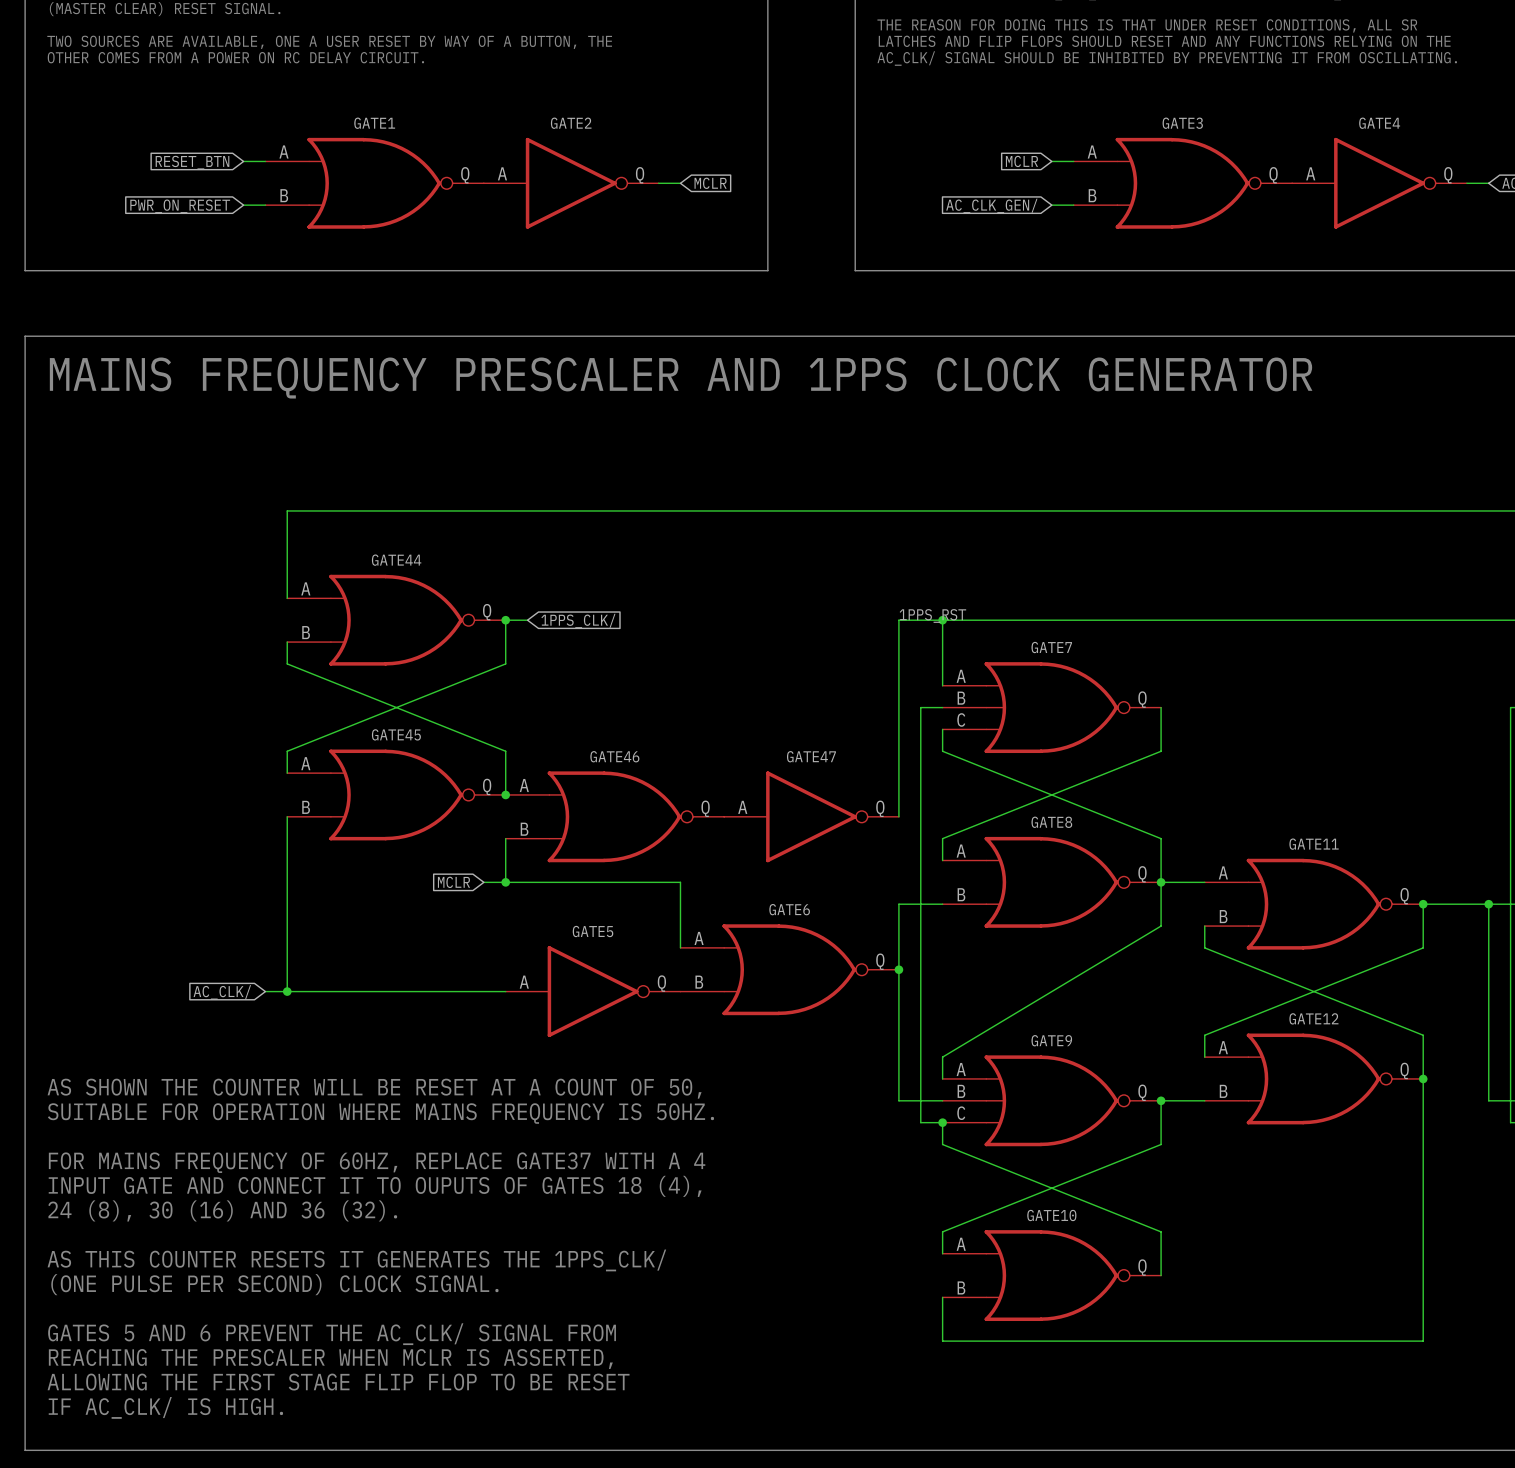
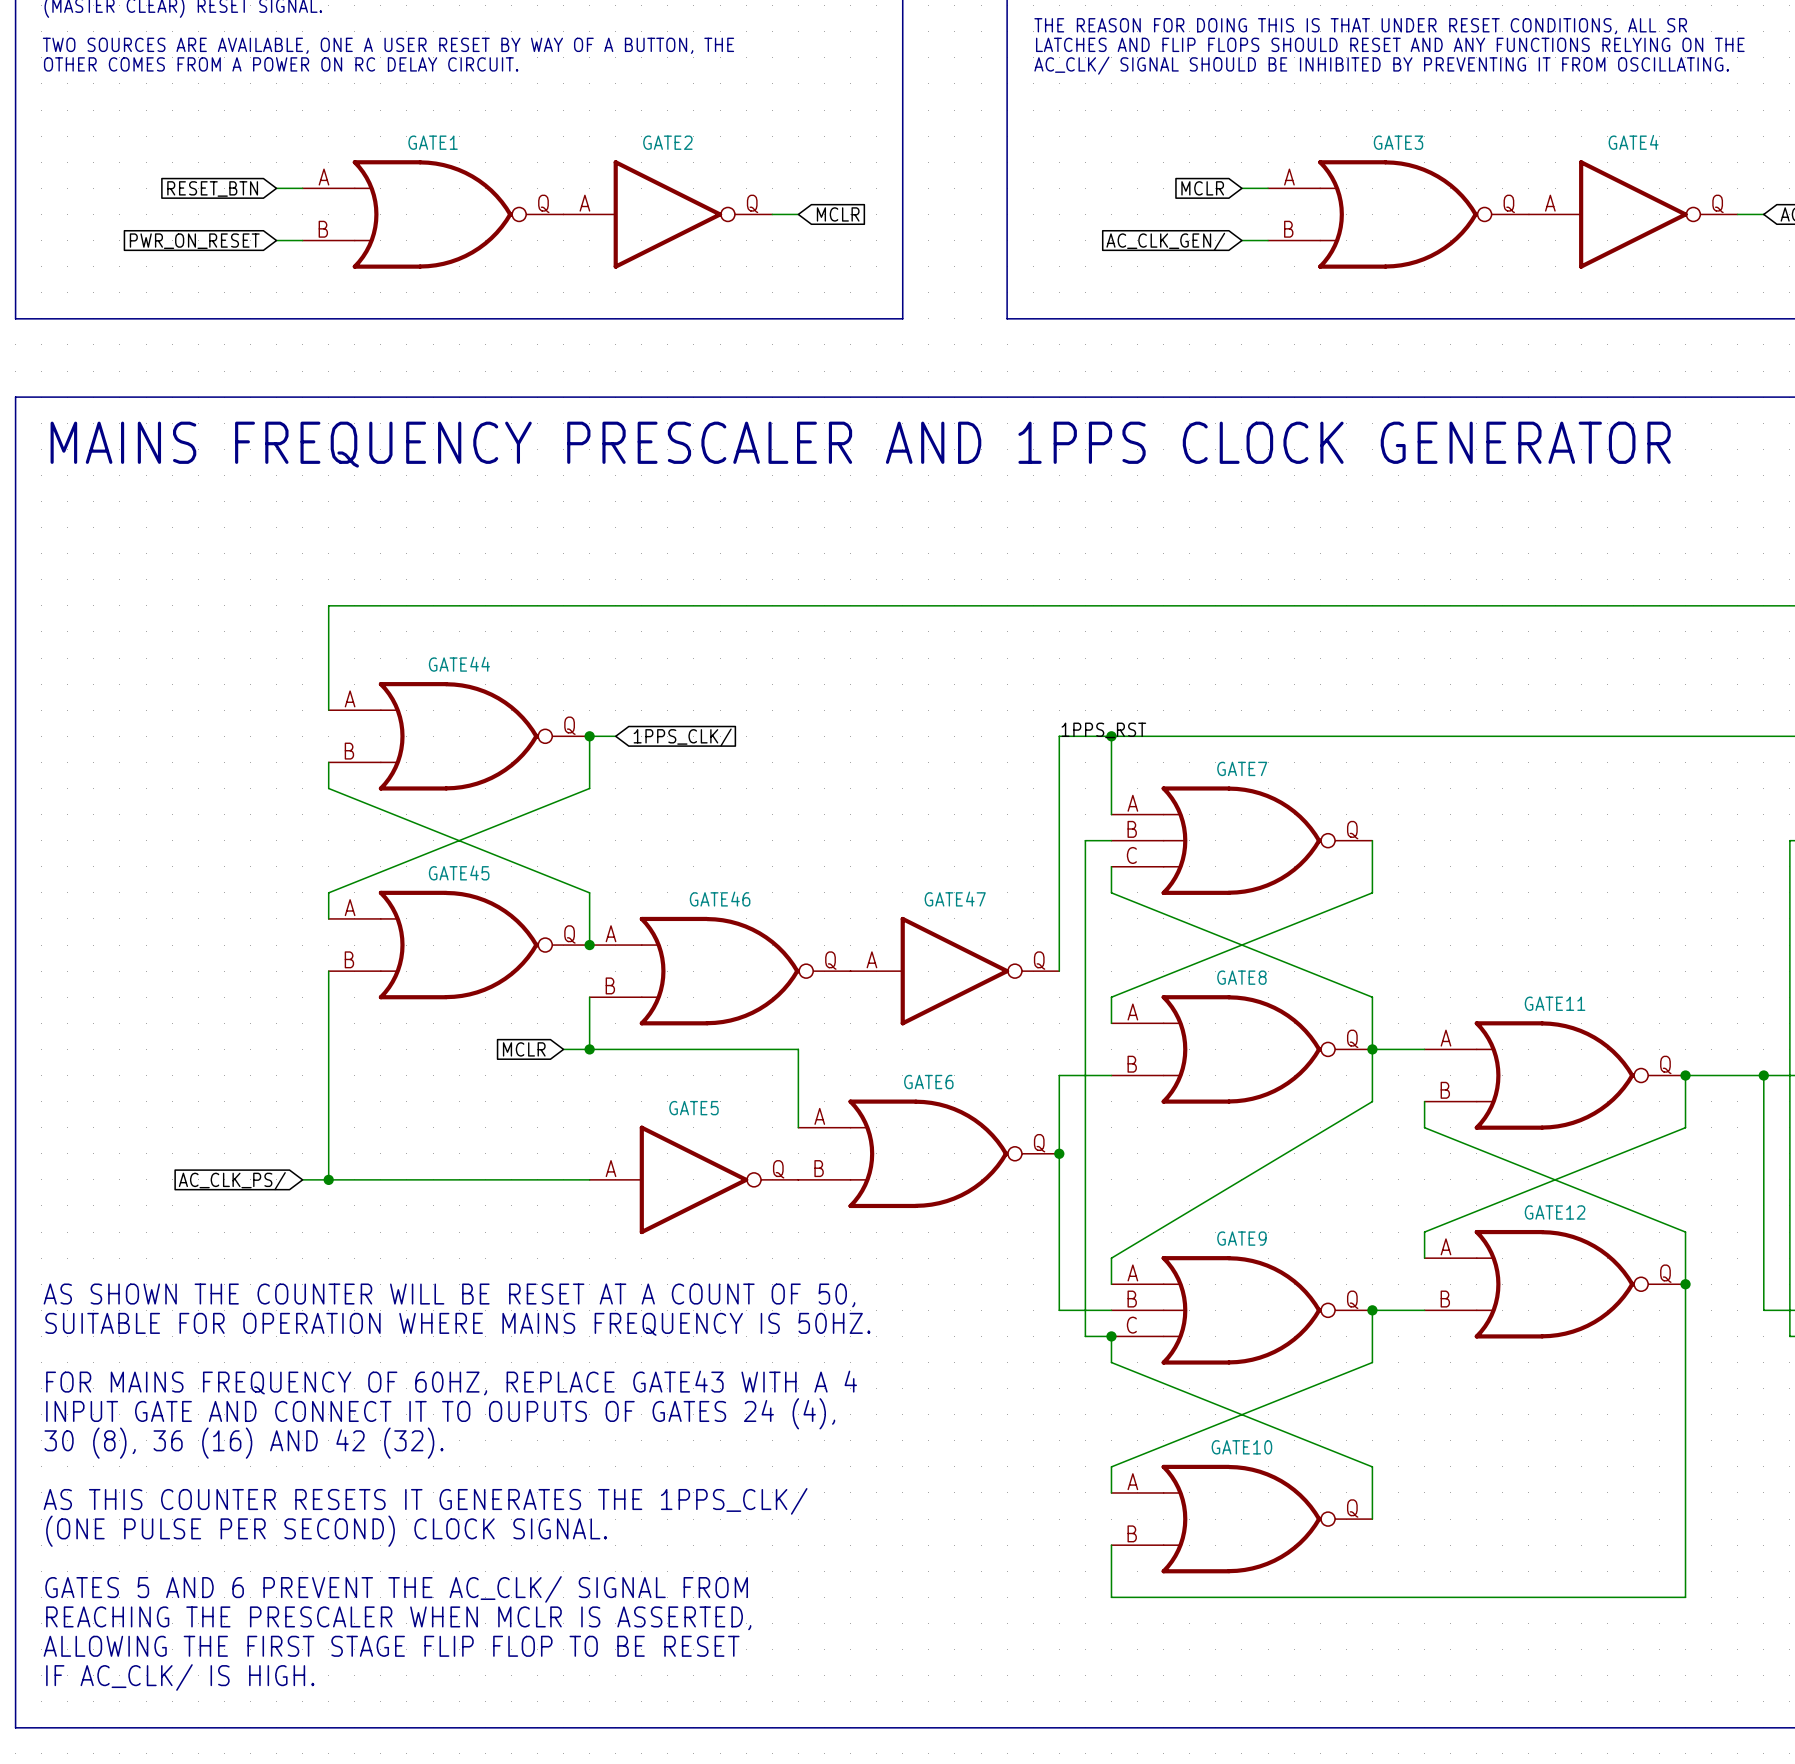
global label: AC_CLK/ (222, 992) -> AC_CLK_PS/ (232, 1181)
text: FOR MAINS FREQUENCY OF 60HZ, REPLACE GATE37 WITH A 4 (377, 1162) -> FOR MAINS FREQUENCY OF 60HZ, REPLACE GATE43 WITH A 4 (451, 1383)
text: INPUT GATE AND CONNECT IT TO OUPUTS OF GATES 18 (4), (375, 1186) -> INPUT GATE AND CONNECT IT TO OUPUTS OF GATES 24 (4), (440, 1413)
text: 24 (8), 30 (16) AND 36 (32). (222, 1210) -> 30 (8), 36 (16) AND 42 (32). (243, 1443)

